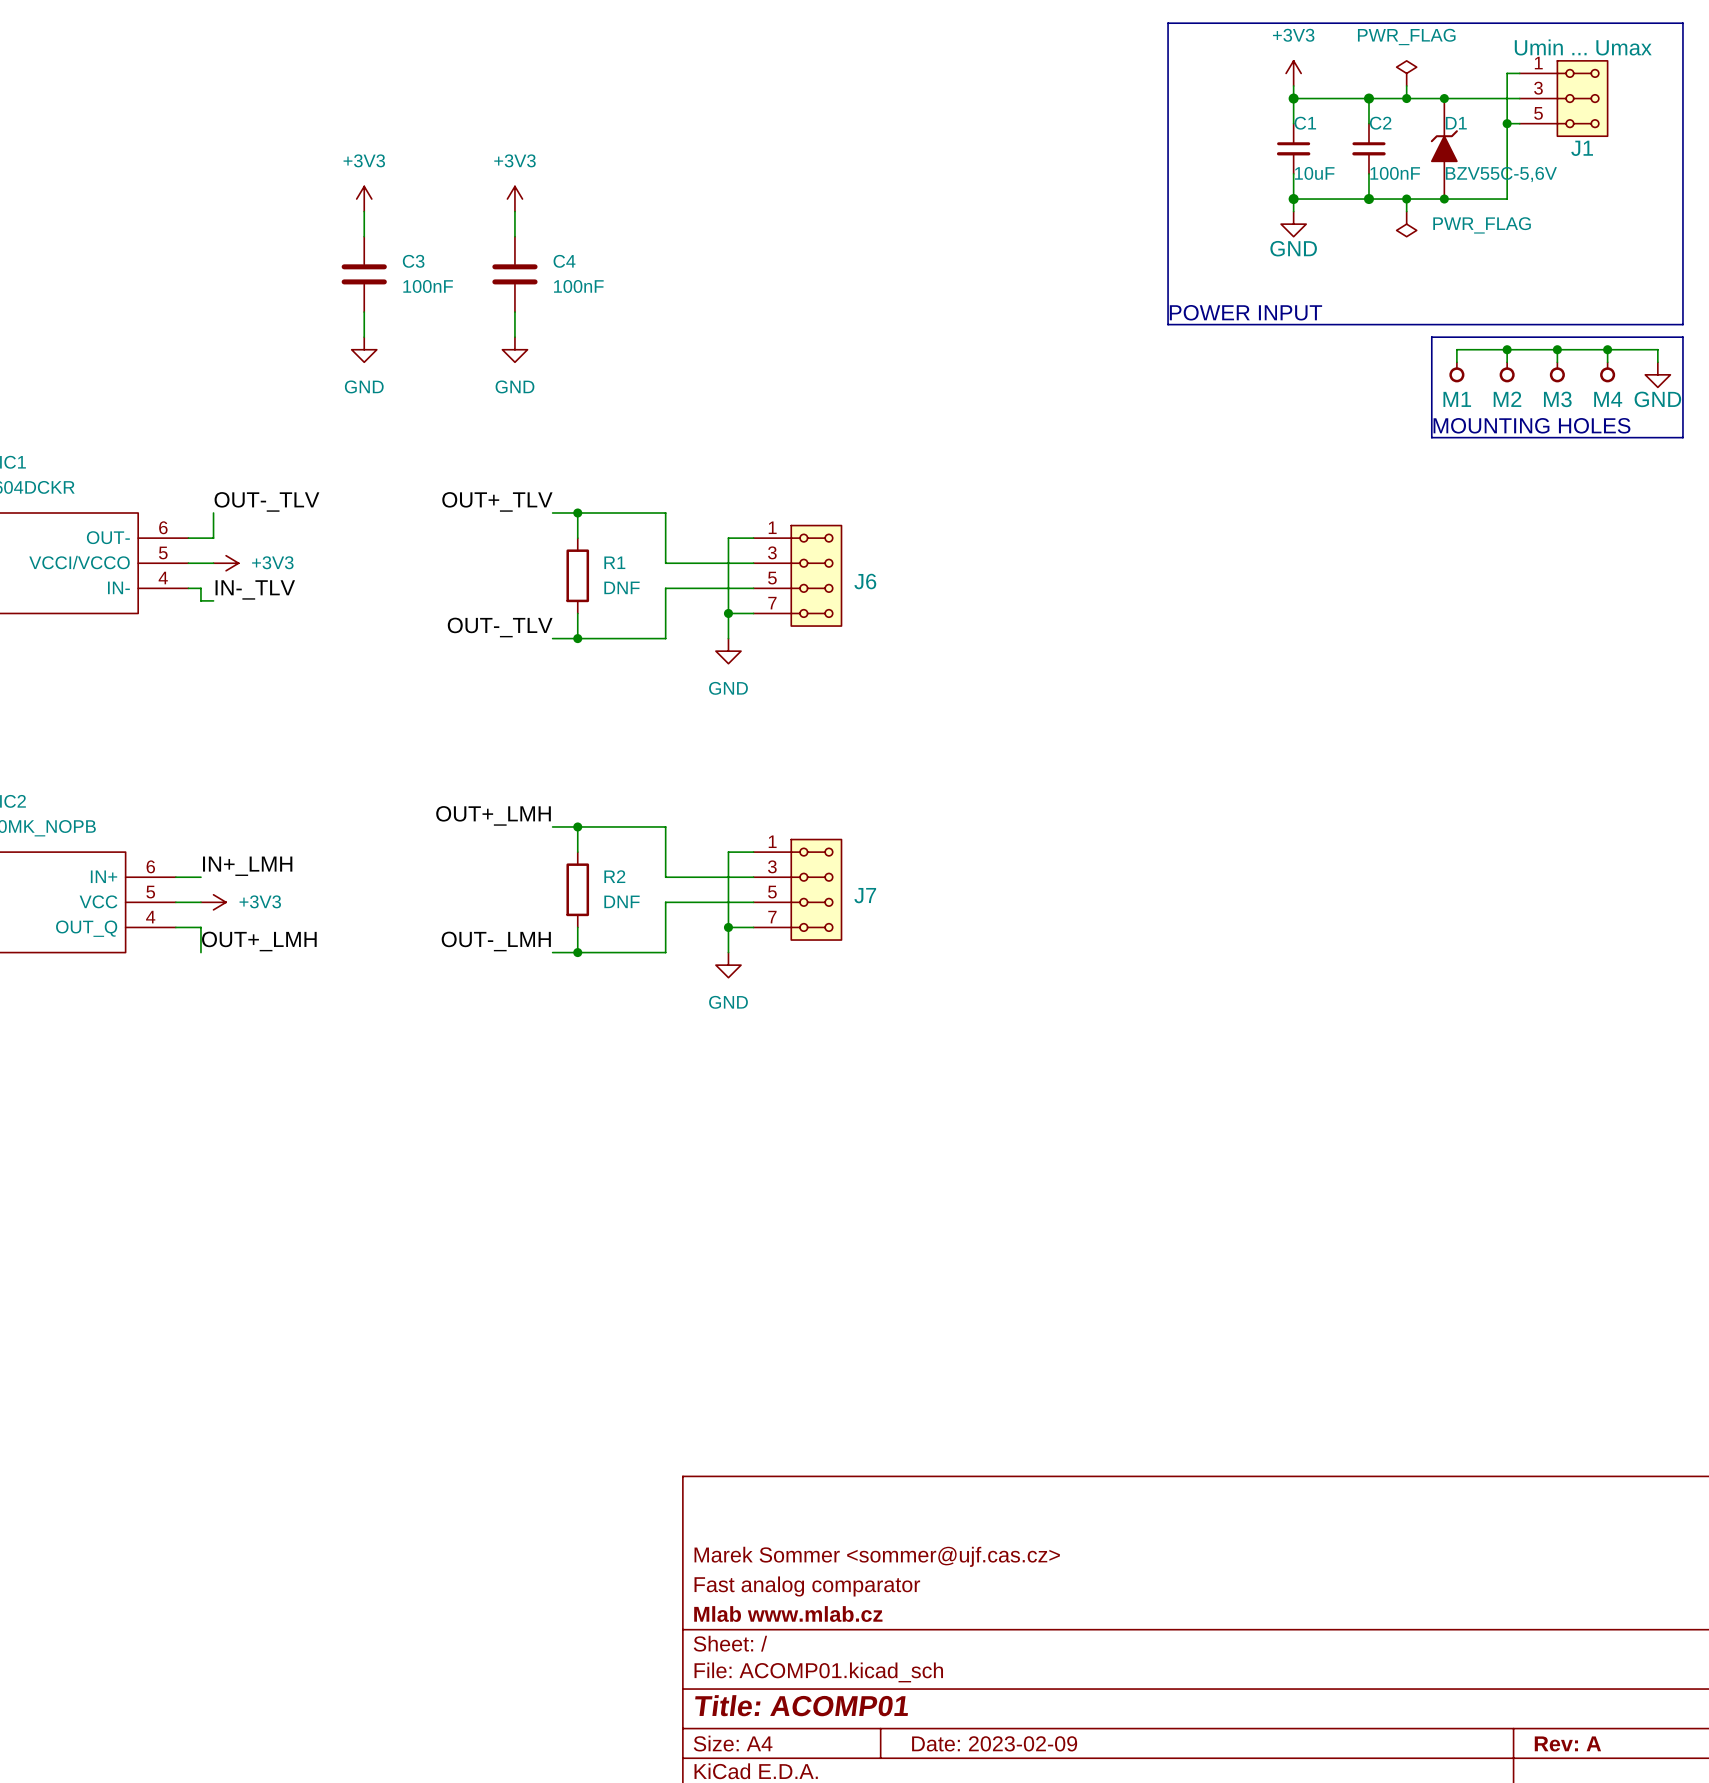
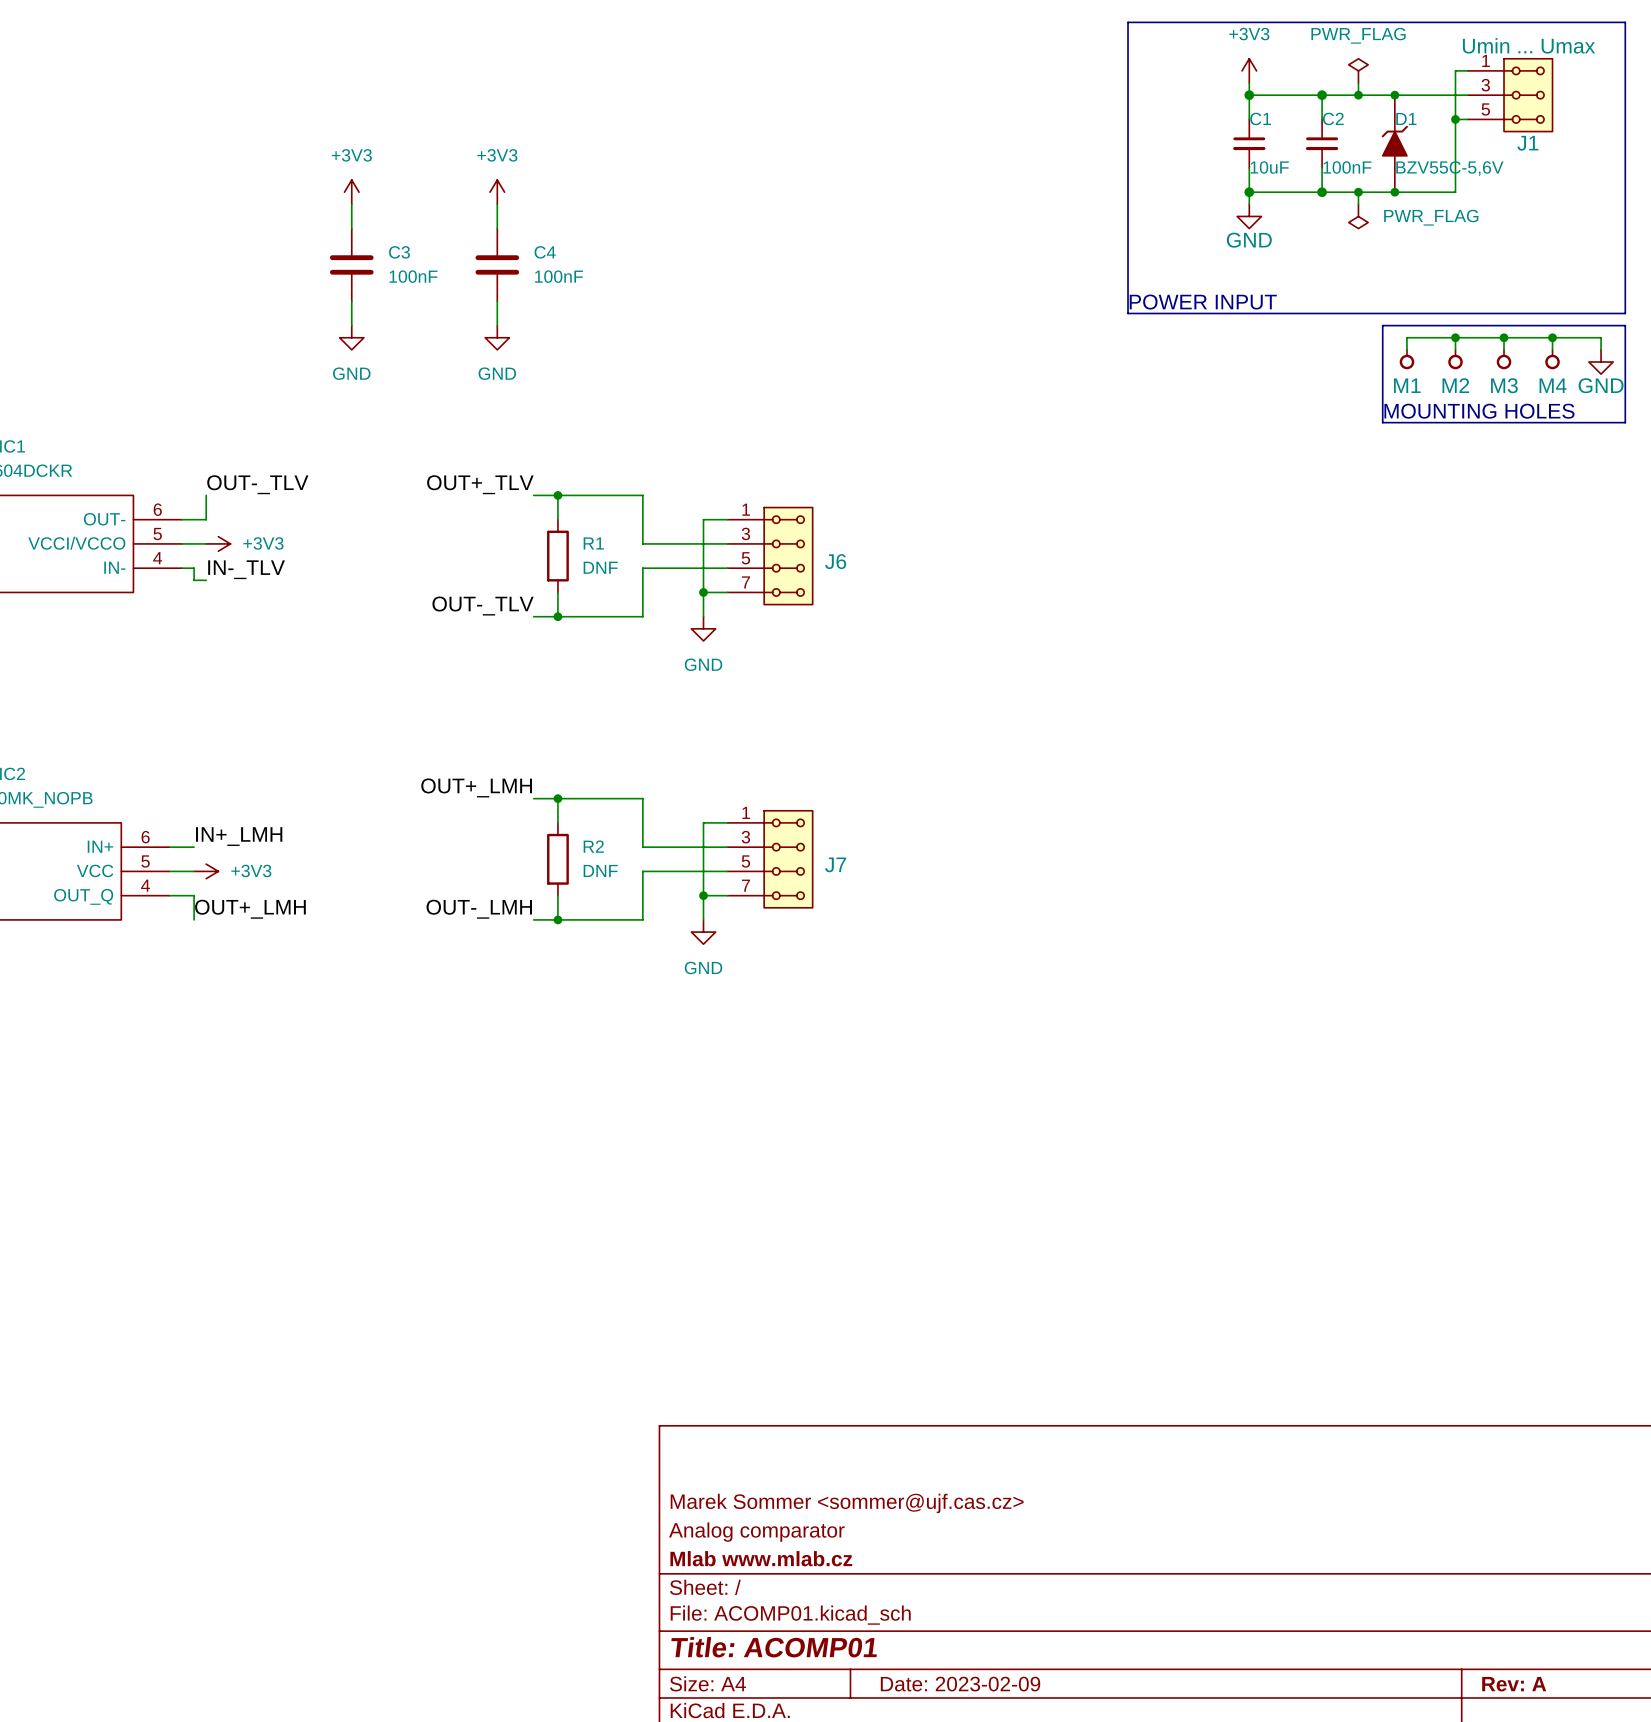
title block: Fast analog comparator (807, 1586) -> Analog comparator (756, 1532)

